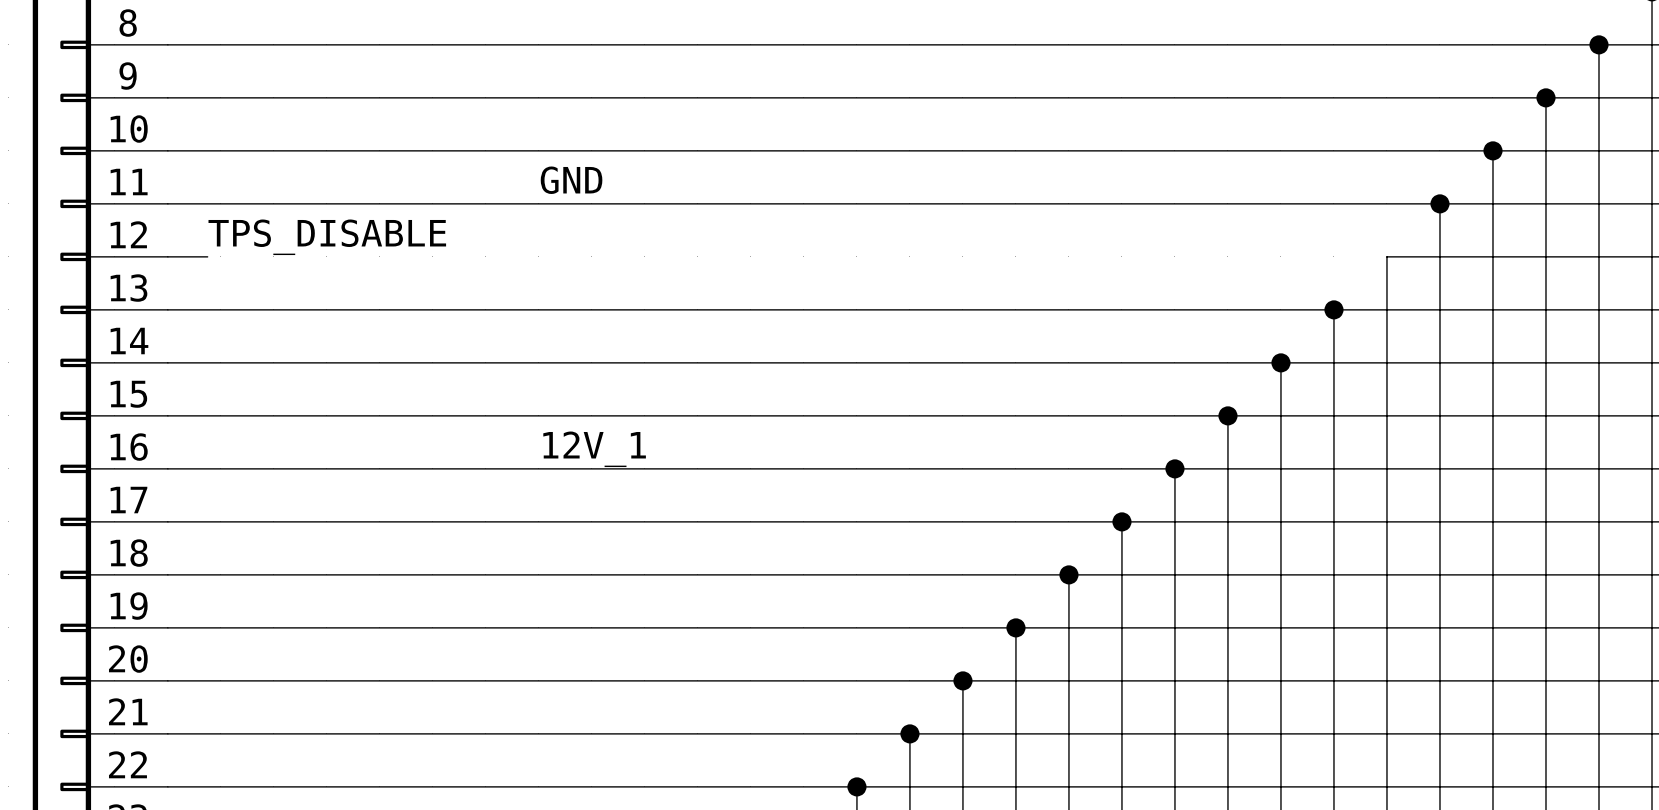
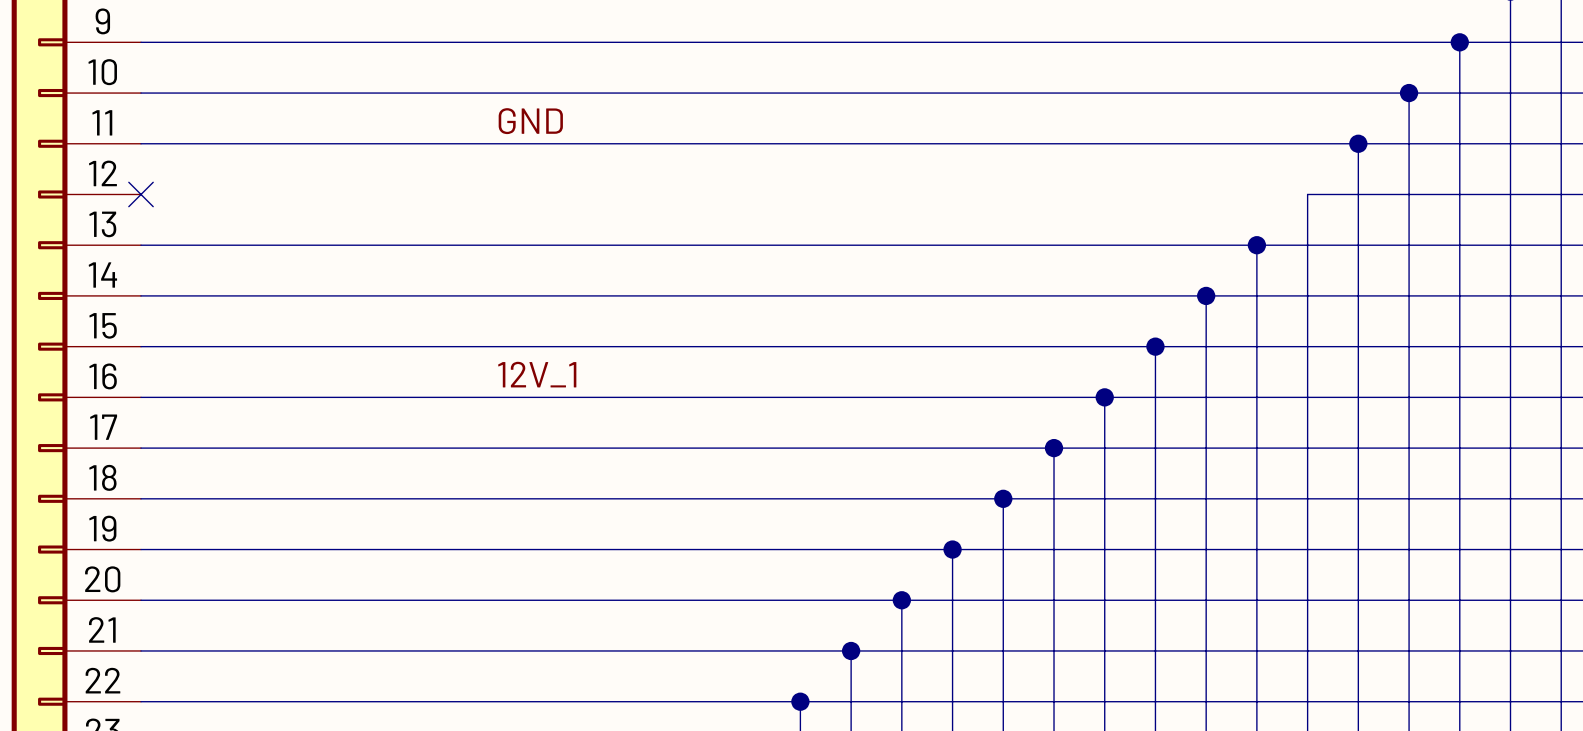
label: TPS_DISABLE (327, 237) -> none
wire: (167, 256) (207, 256) -> none
no-connect mark: none -> (141, 194)

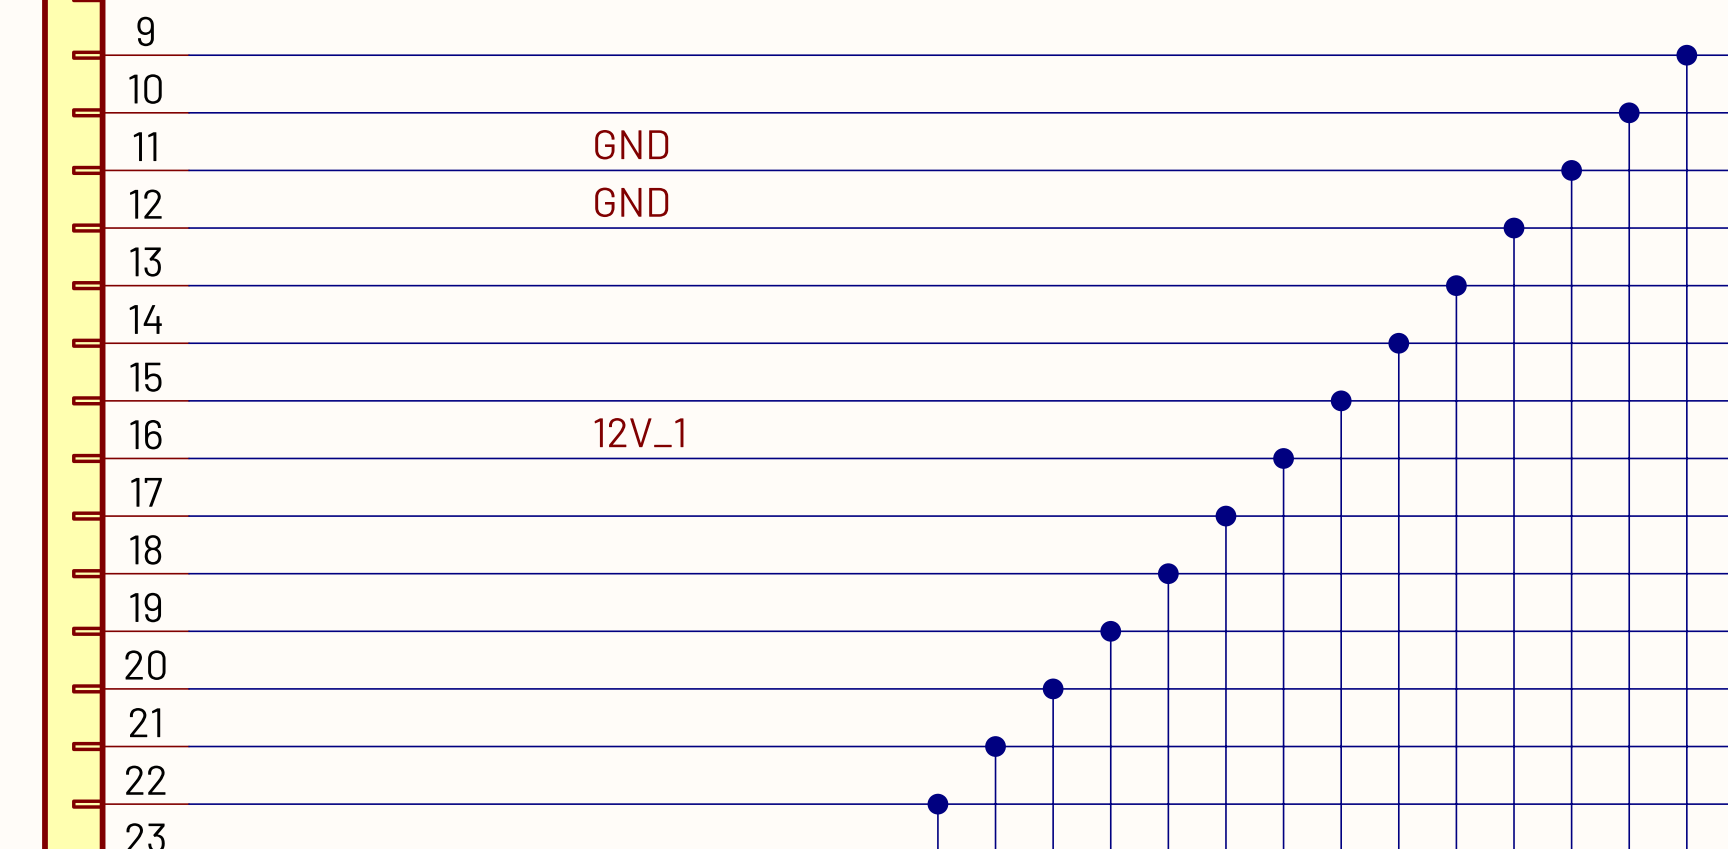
label: none -> GND (631, 202)
wire: none -> (189, 228) (1514, 228)
no-connect mark: (141, 194) -> none
junction: none -> (1514, 228)

